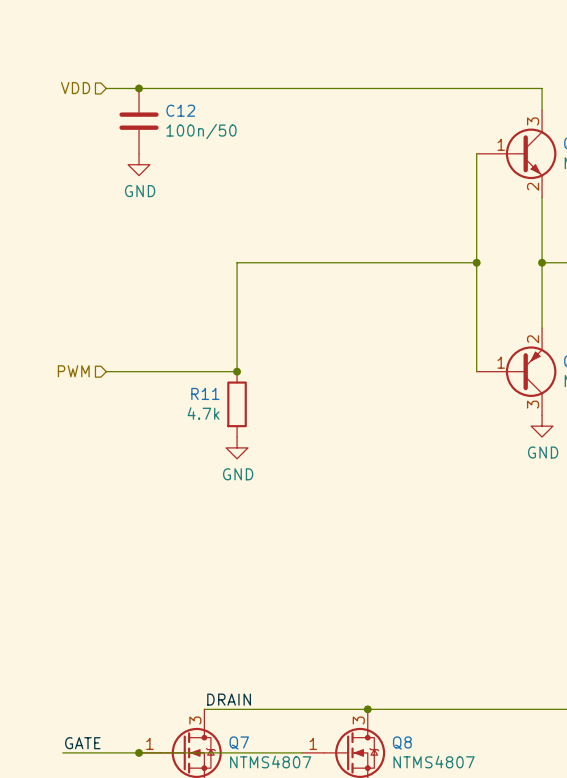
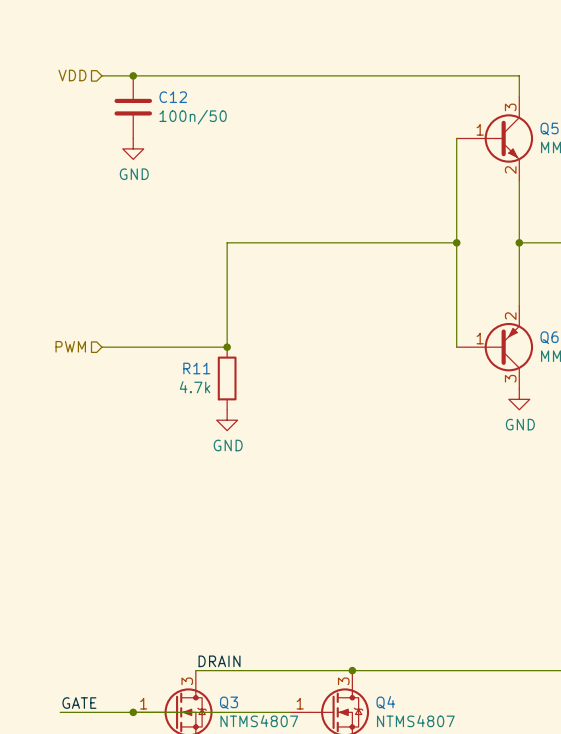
Q7 name: Q7 (239, 743) -> Q3 (229, 702)
Q8 name: Q8 (402, 743) -> Q4 (385, 702)

